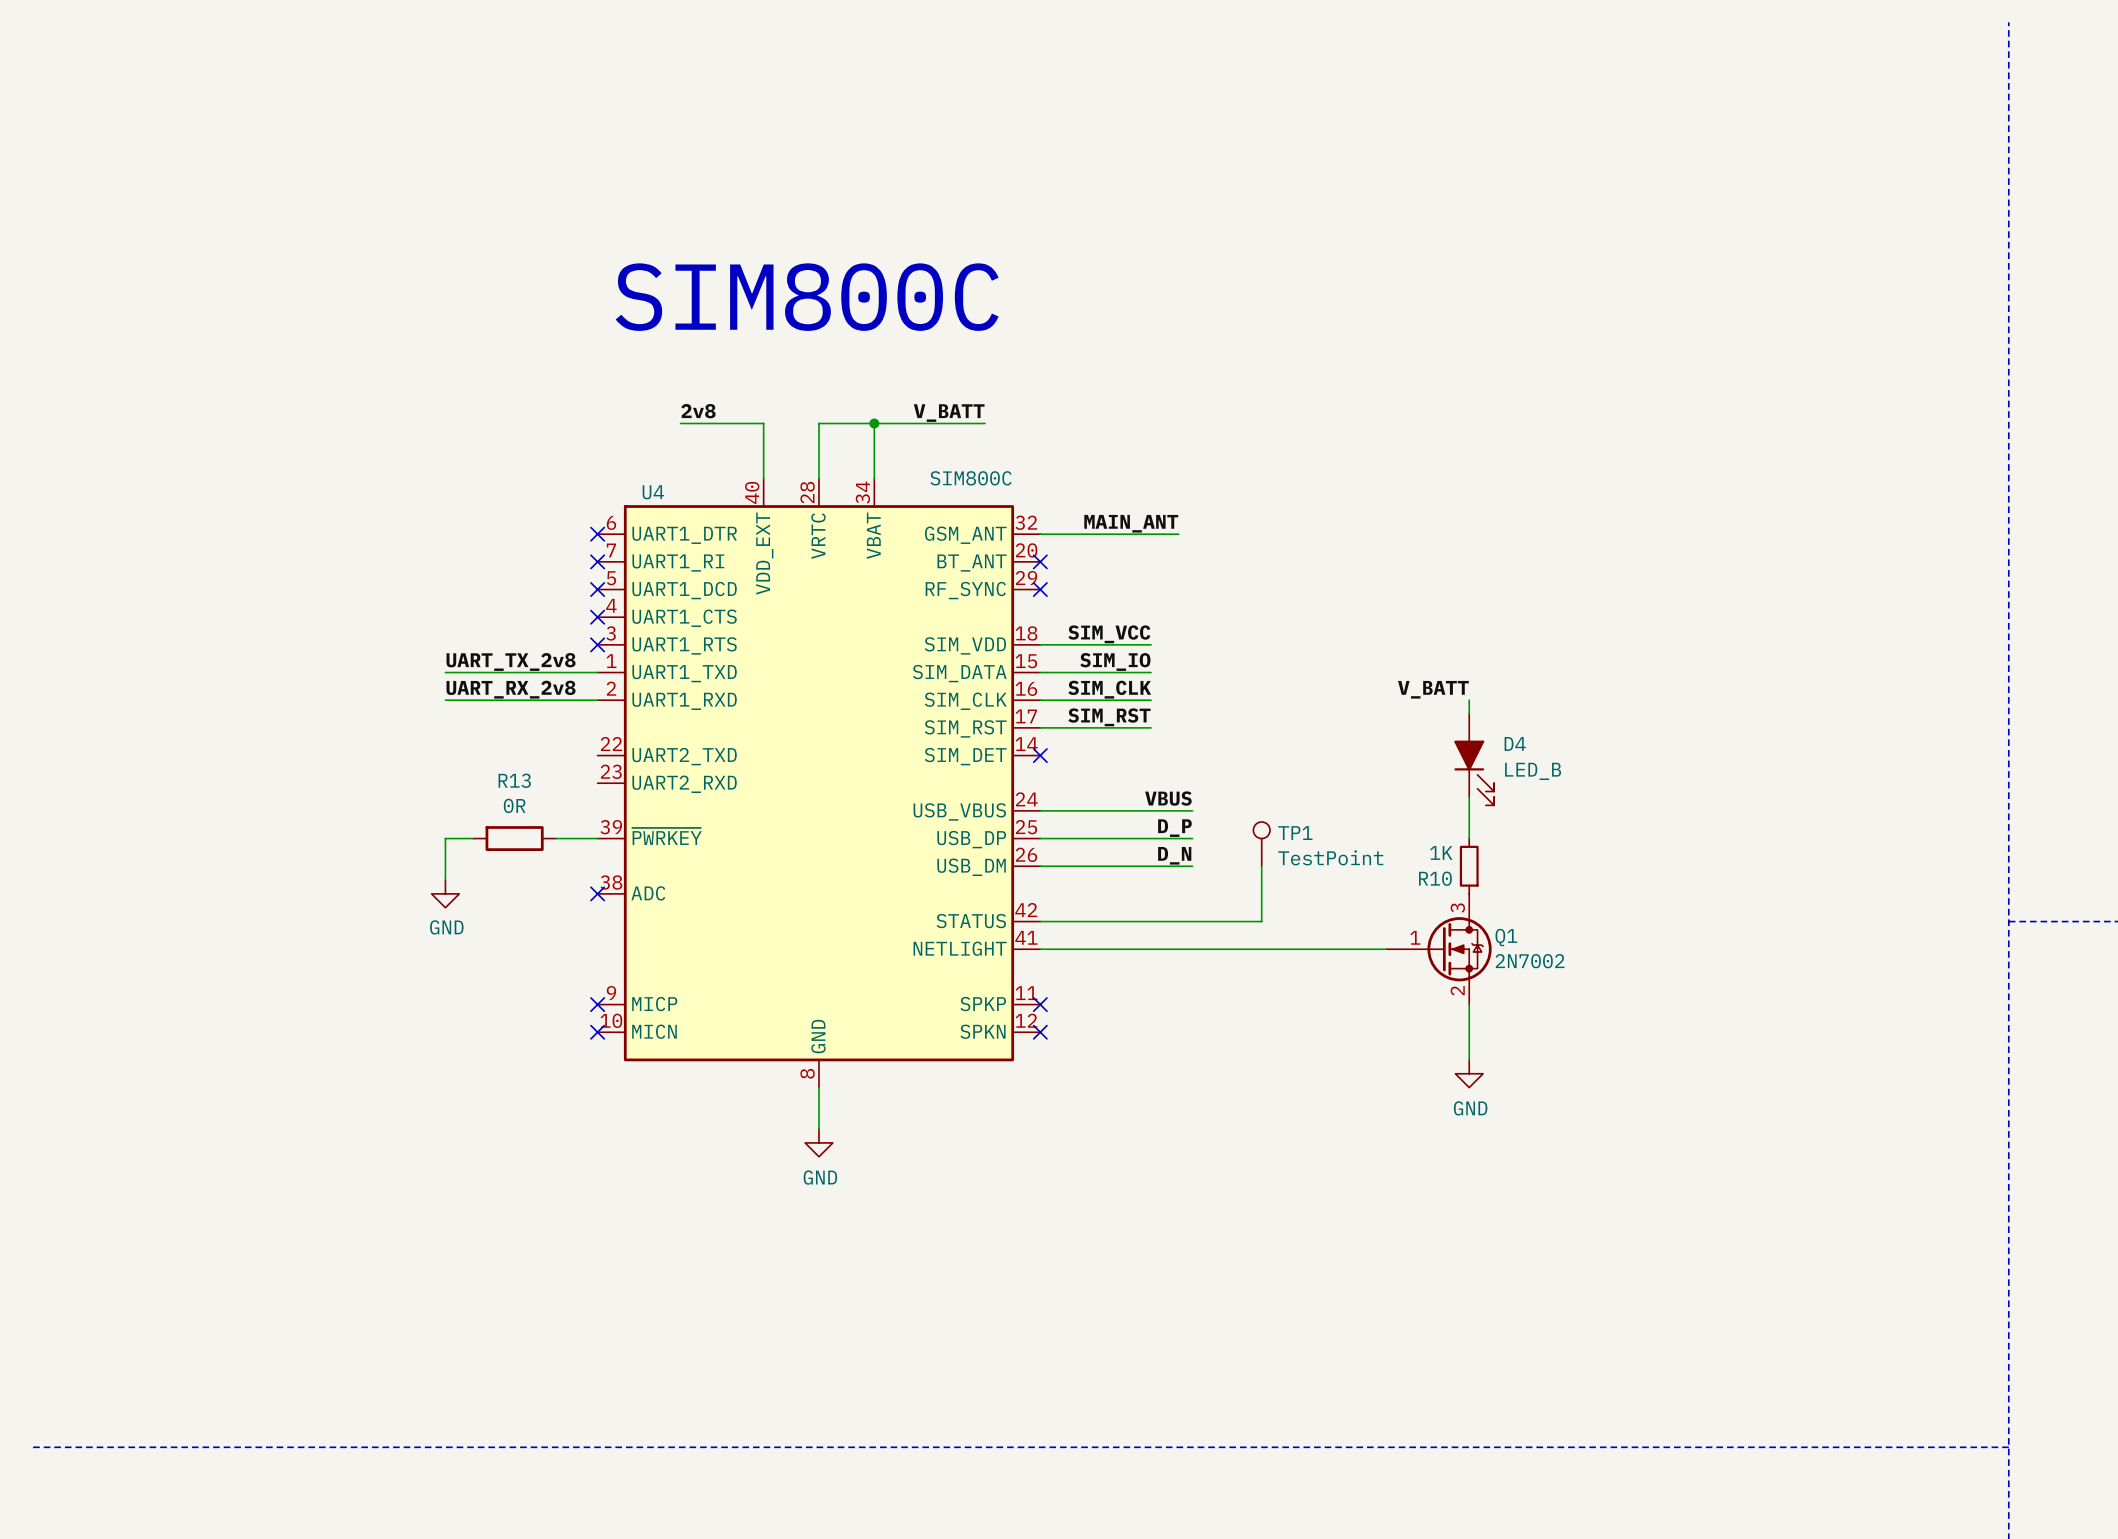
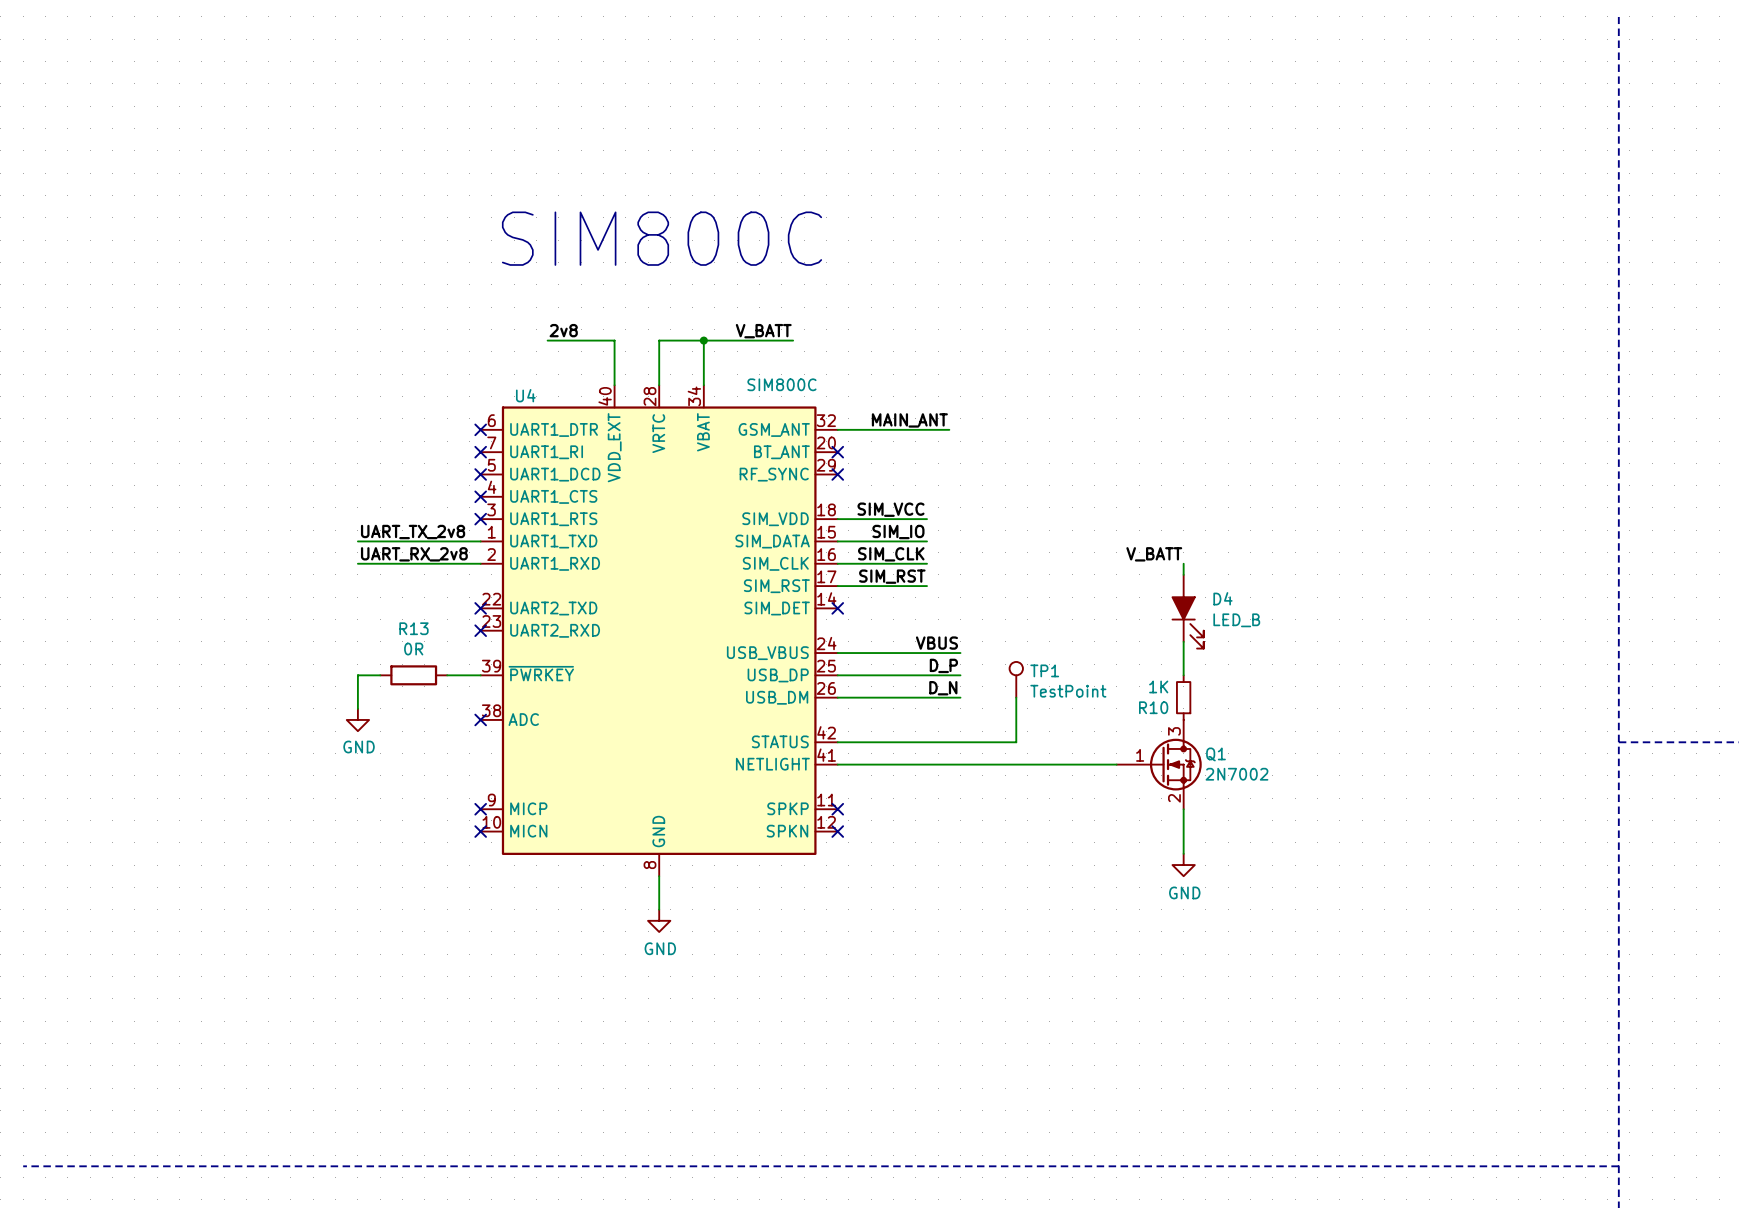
no-connect mark: none -> (480, 608)
no-connect mark: none -> (480, 630)

